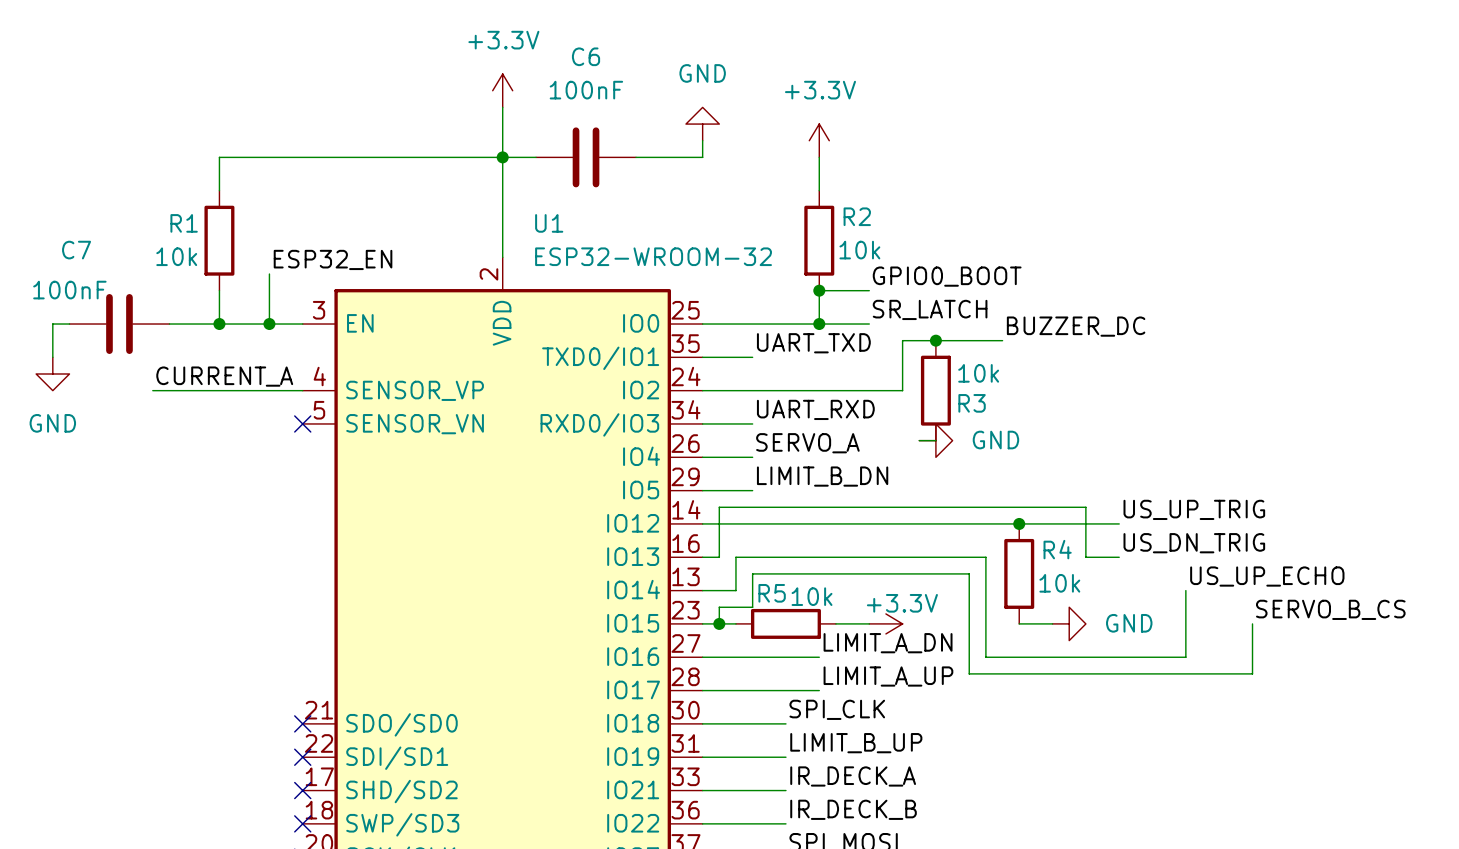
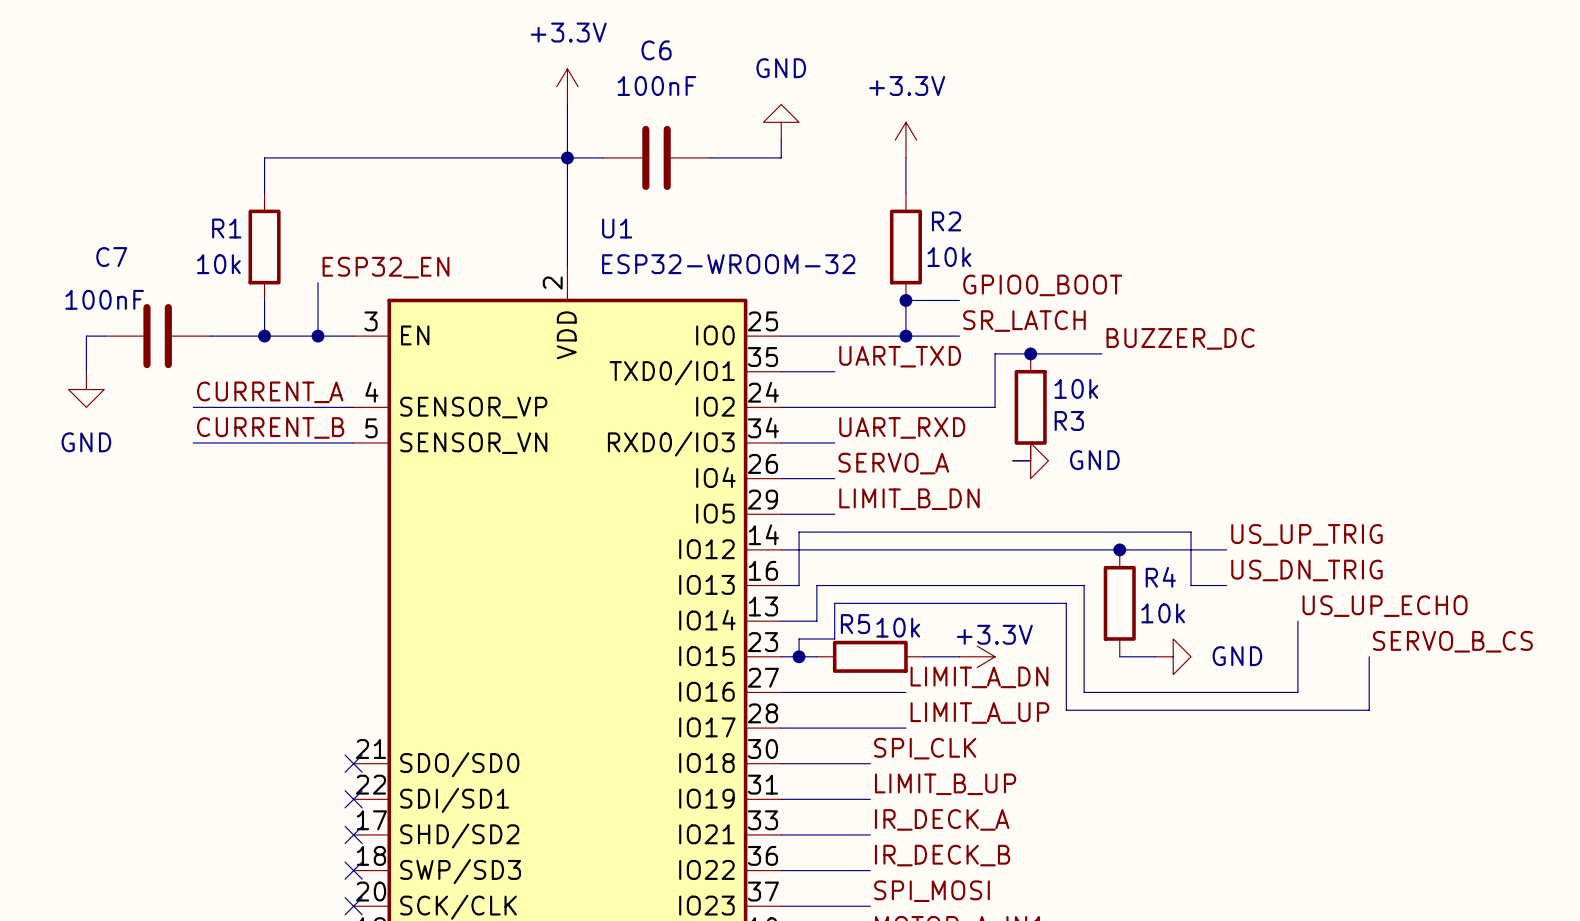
label: none -> CURRENT_B (270, 427)
wire: none -> (193, 443) (353, 443)
no-connect mark: (302, 423) -> none

